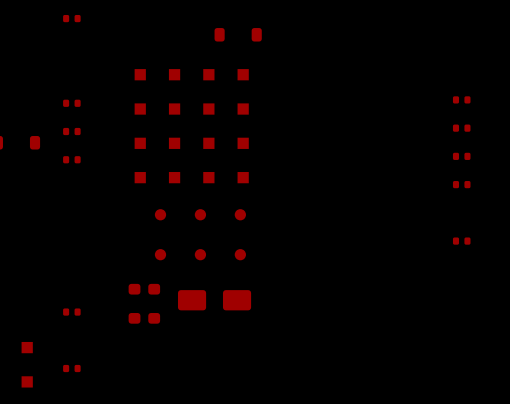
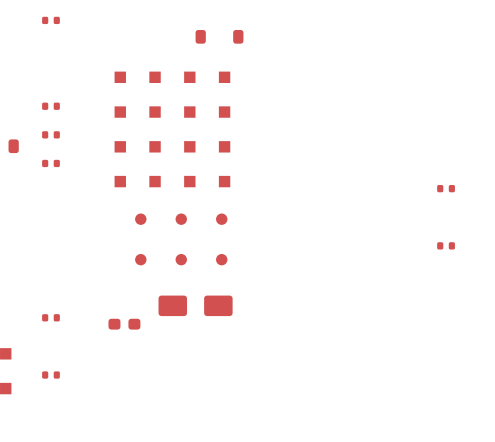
part: (461, 99) -> none
part: (461, 128) -> none
part: (461, 156) -> none
part: (144, 289) -> none

